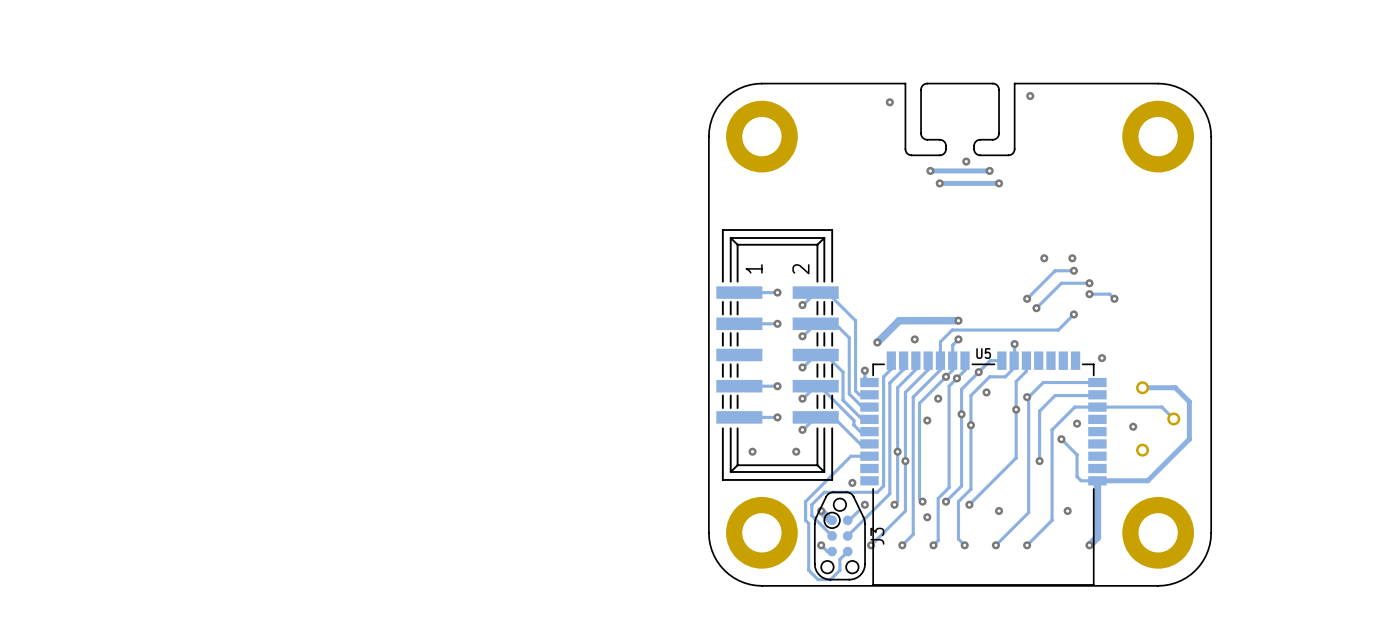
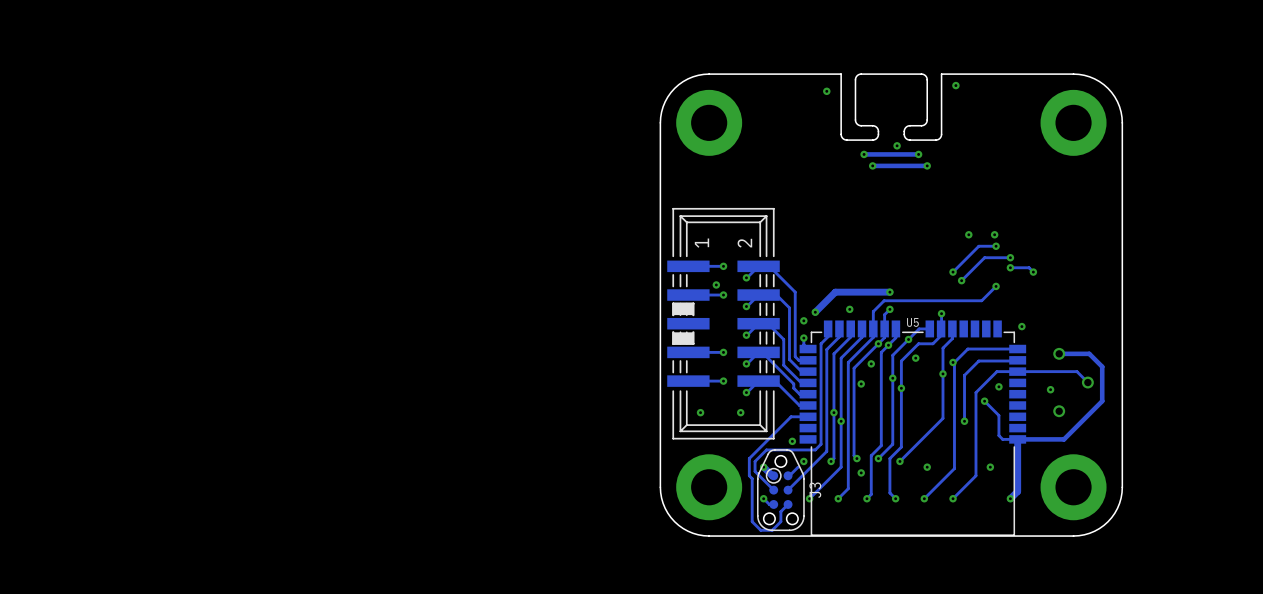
via: none -> (716, 284)
drawing: none -> [673, 303, 694, 316]
line: none -> (693, 315) (693, 303) (673, 303) (673, 315)
via: none -> (803, 320)
drawing: none -> [673, 332, 694, 344]
line: none -> (693, 332) (693, 343) (673, 343) (673, 332)

